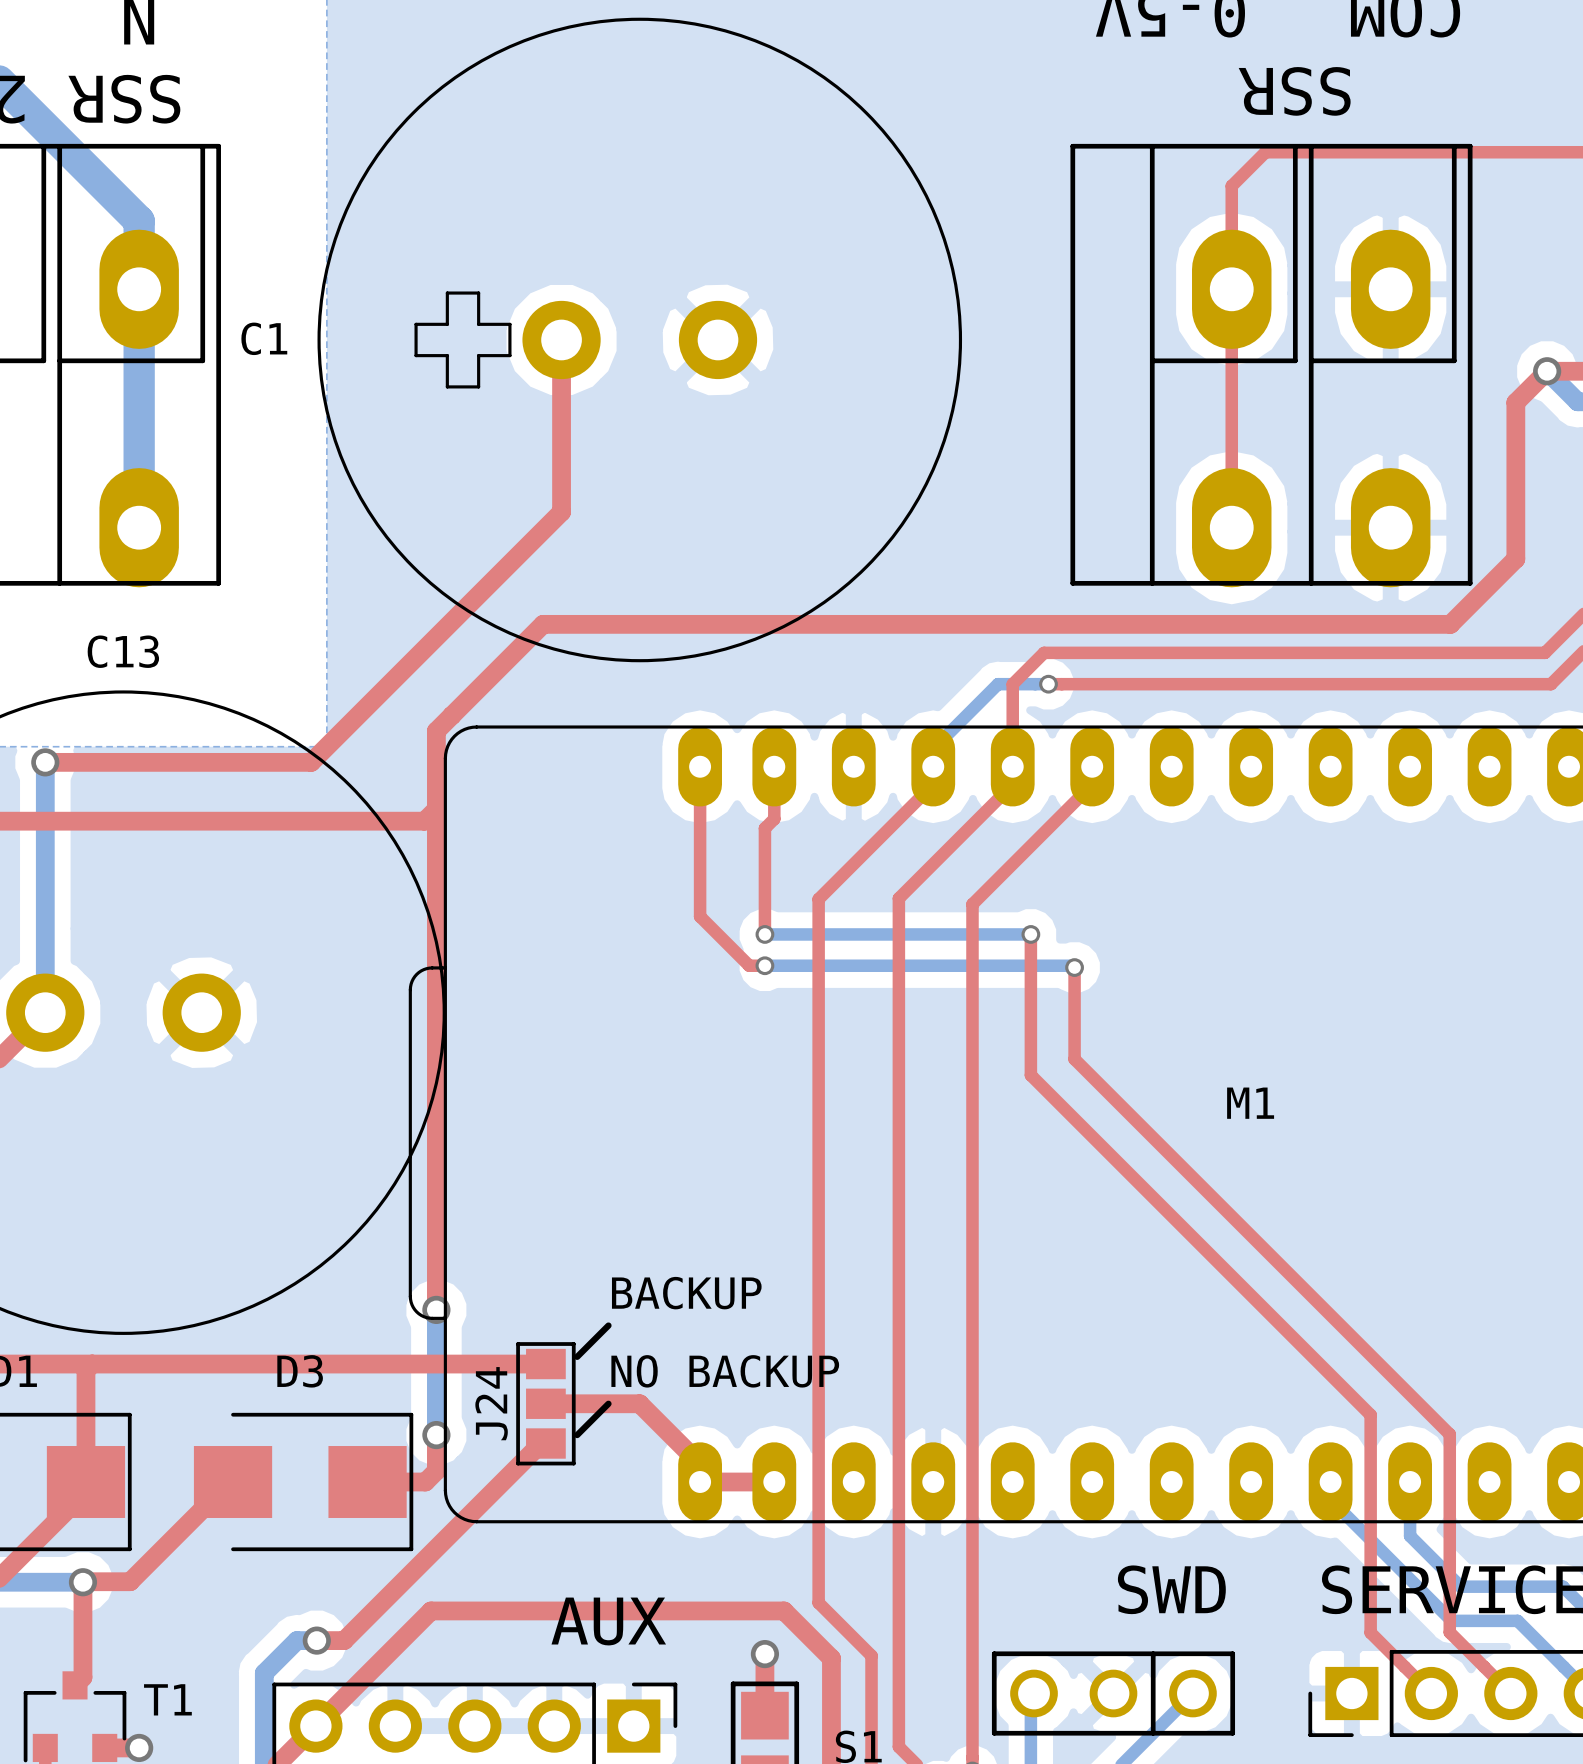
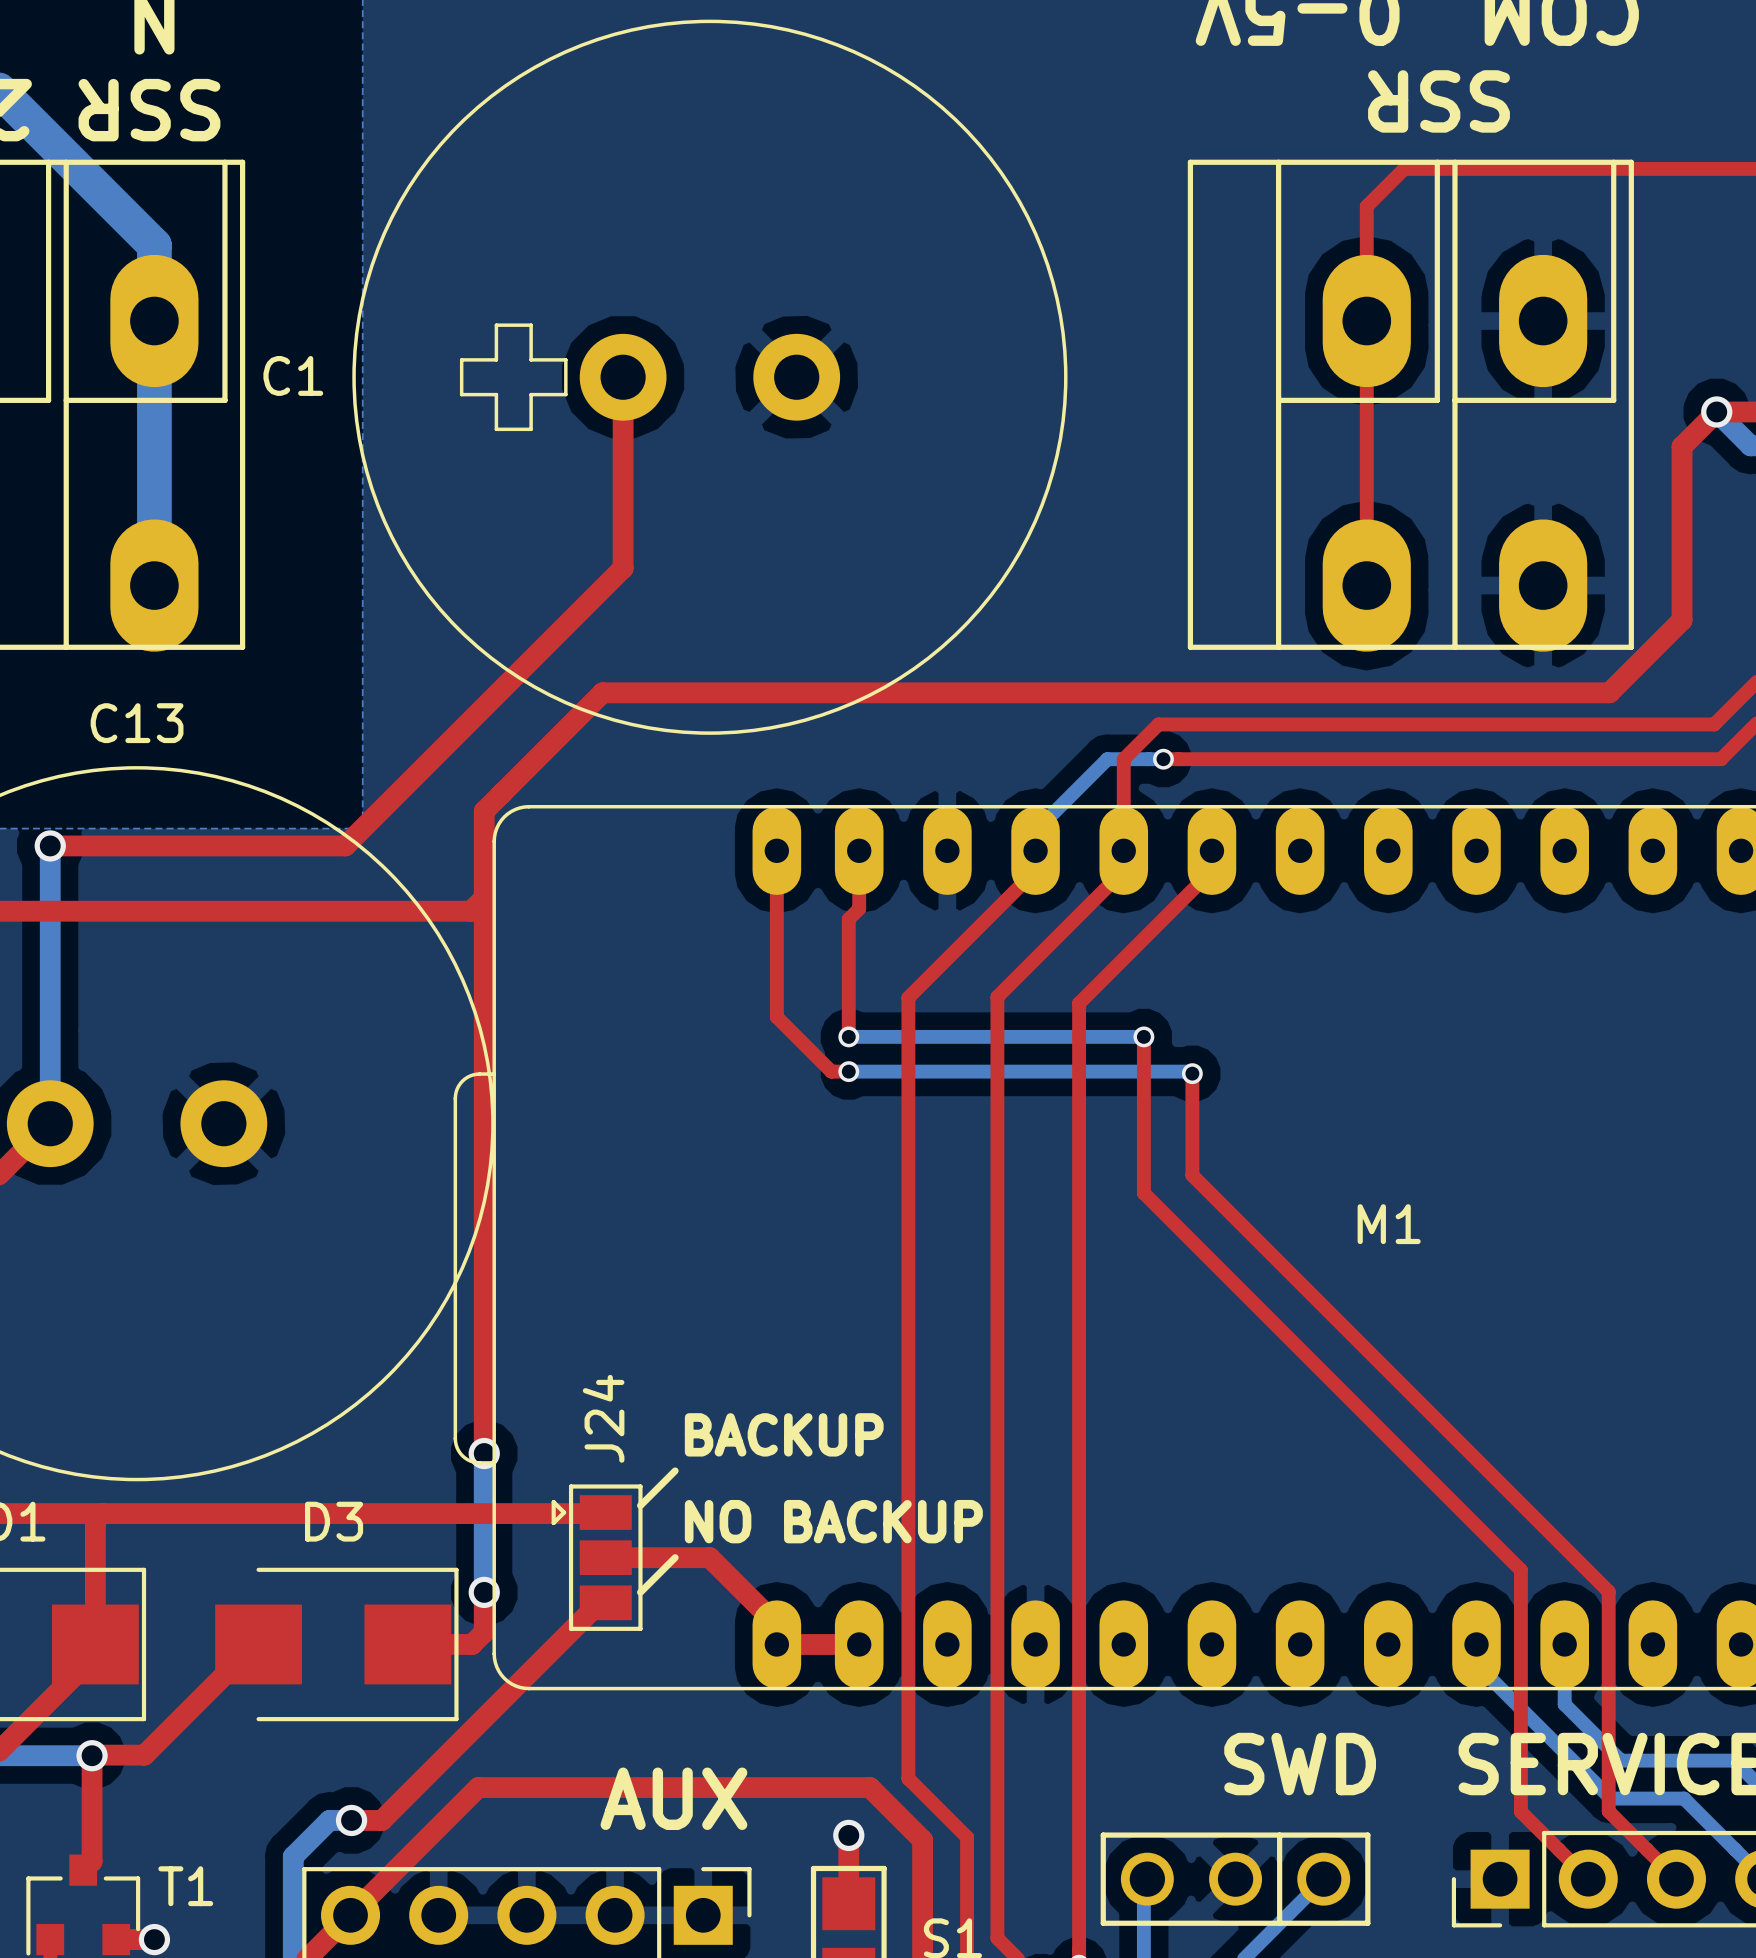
J24 footprint: [516, 1342, 576, 1466] -> [551, 1484, 643, 1631]
J24 name position: J24 (491, 1403) -> J24 (603, 1418)

